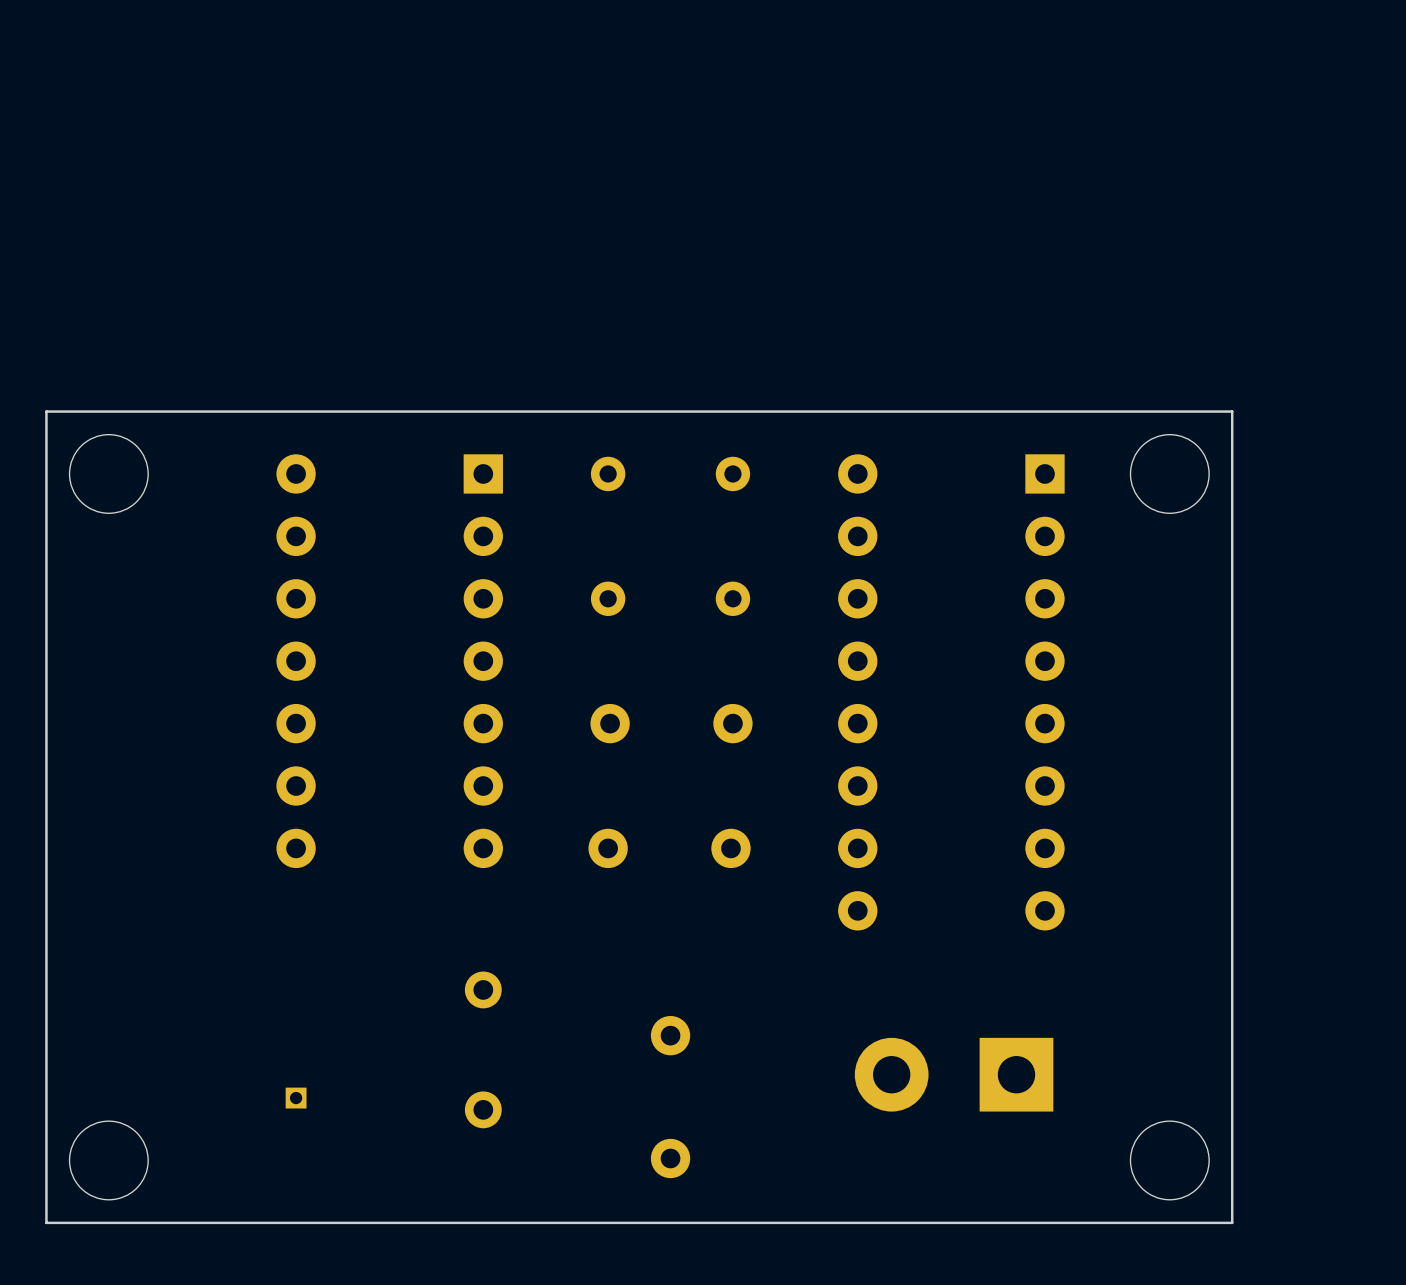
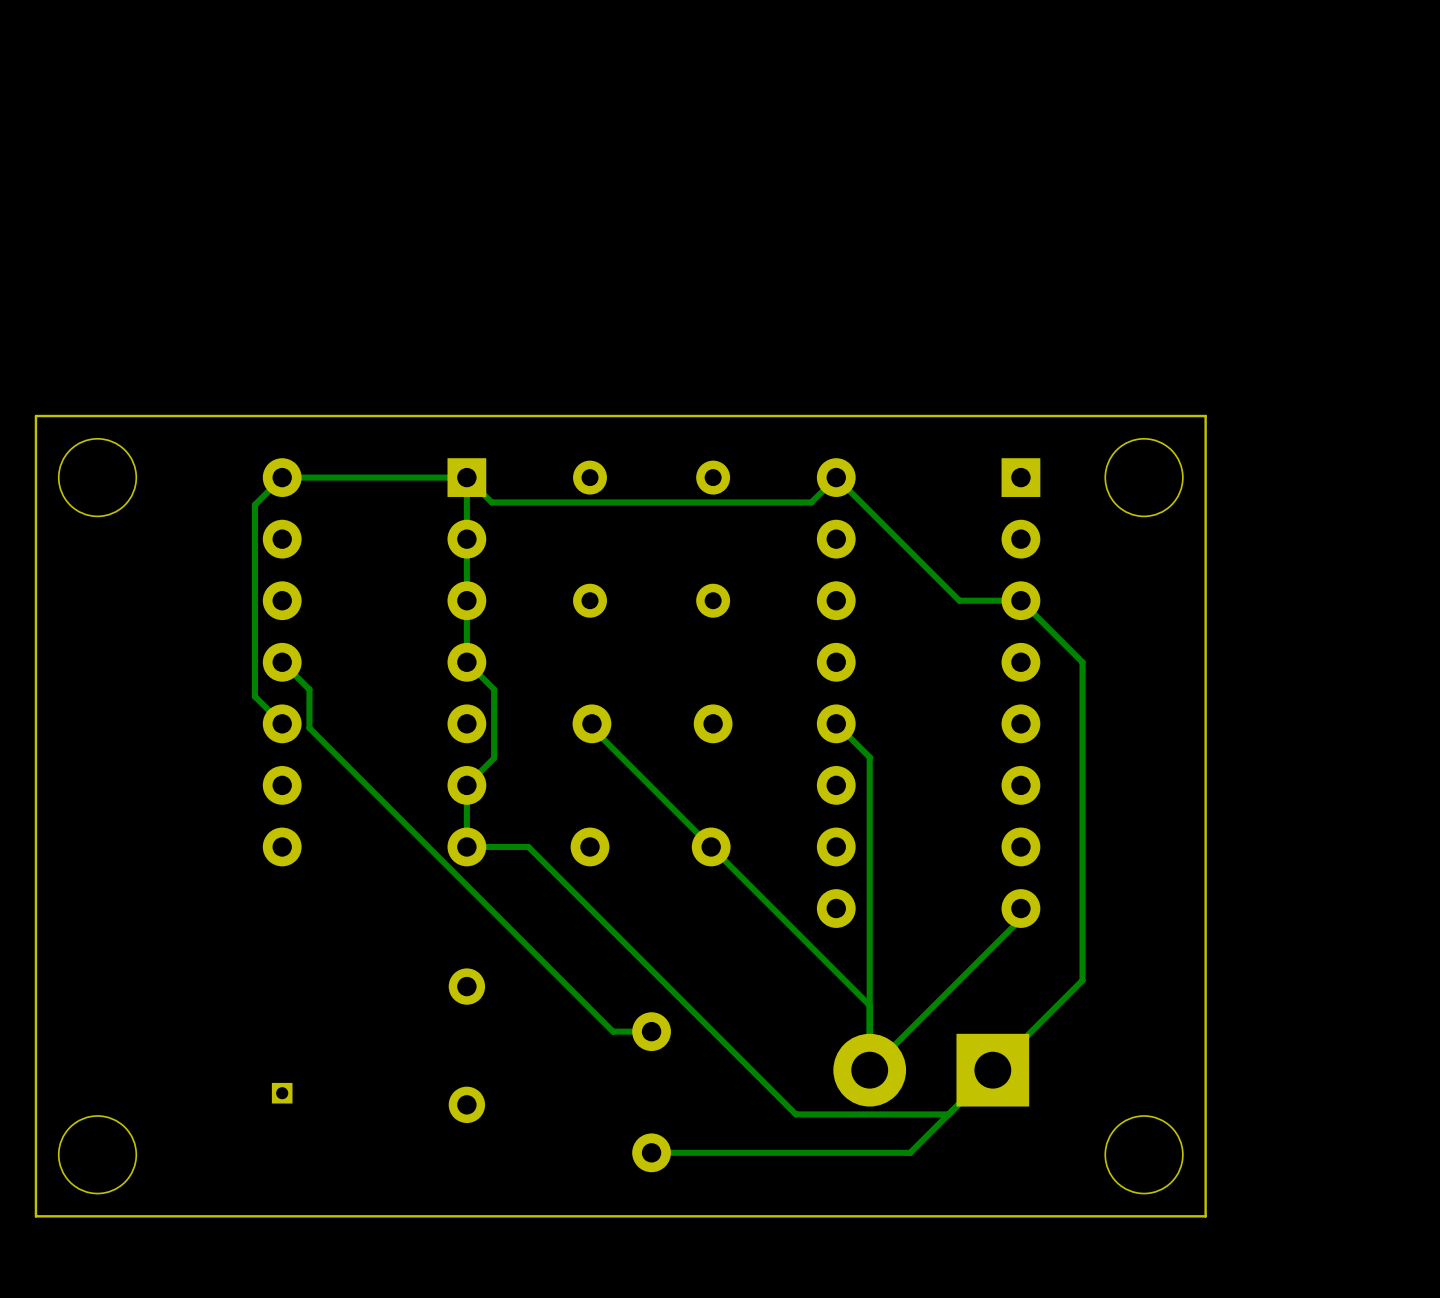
track: none -> (466, 477) (282, 477) (254, 504) (254, 696) (282, 723)
track: none -> (466, 477) (466, 662) (494, 689) (494, 758) (466, 785) (466, 846) (528, 846) (795, 1114) (948, 1114)
track: none -> (466, 477) (491, 502) (811, 502) (836, 477) (959, 600) (1020, 600) (1082, 662) (1082, 980) (910, 1152) (651, 1152)
track: none -> (282, 662) (309, 689) (309, 728) (613, 1031) (651, 1031)
track: none -> (591, 723) (591, 727) (869, 1005)
track: none -> (836, 723) (869, 757) (869, 1070) (1020, 918) (1020, 908)

